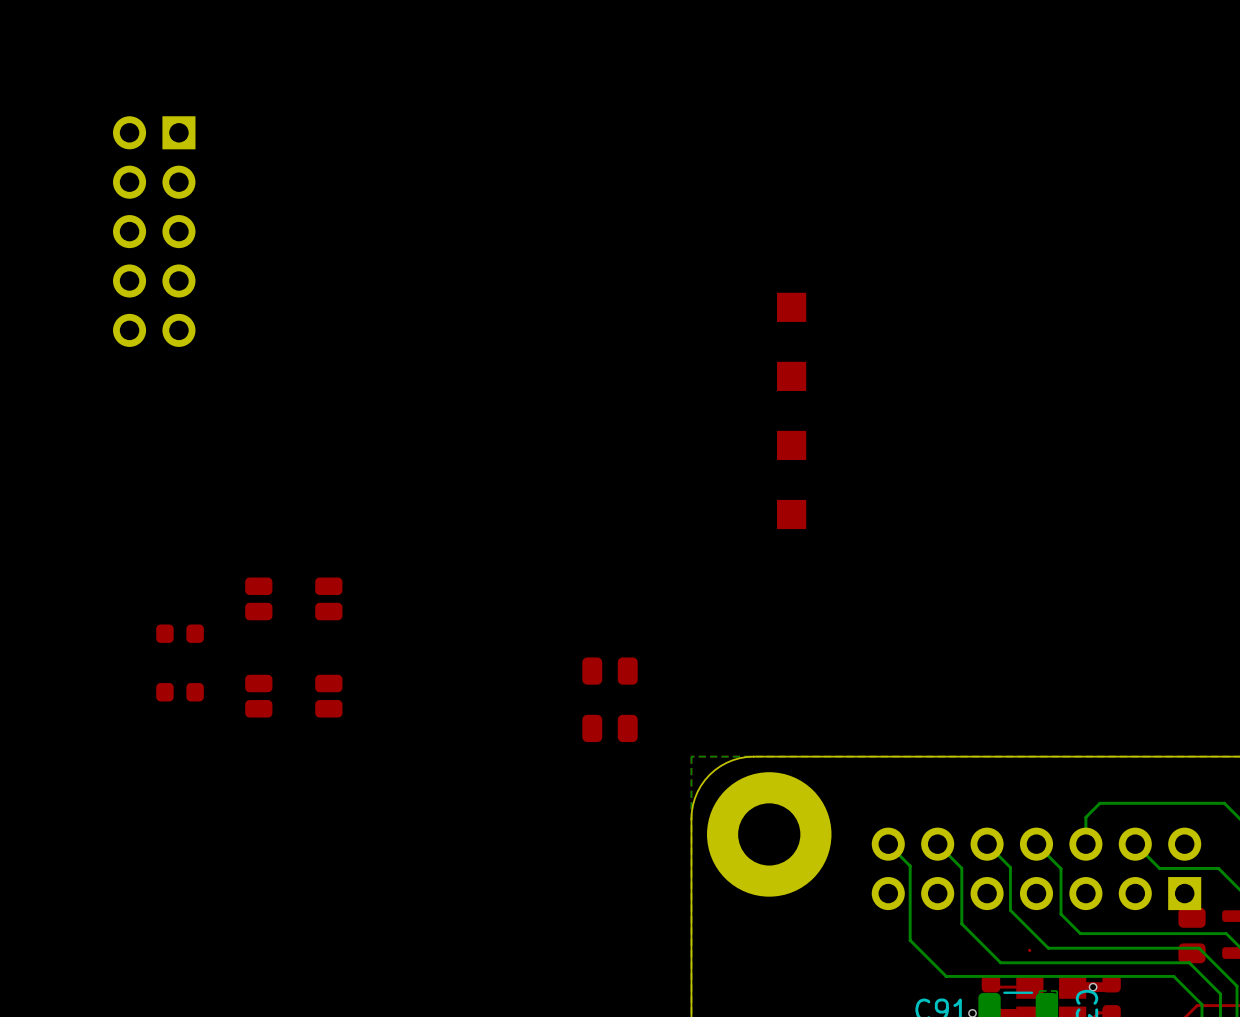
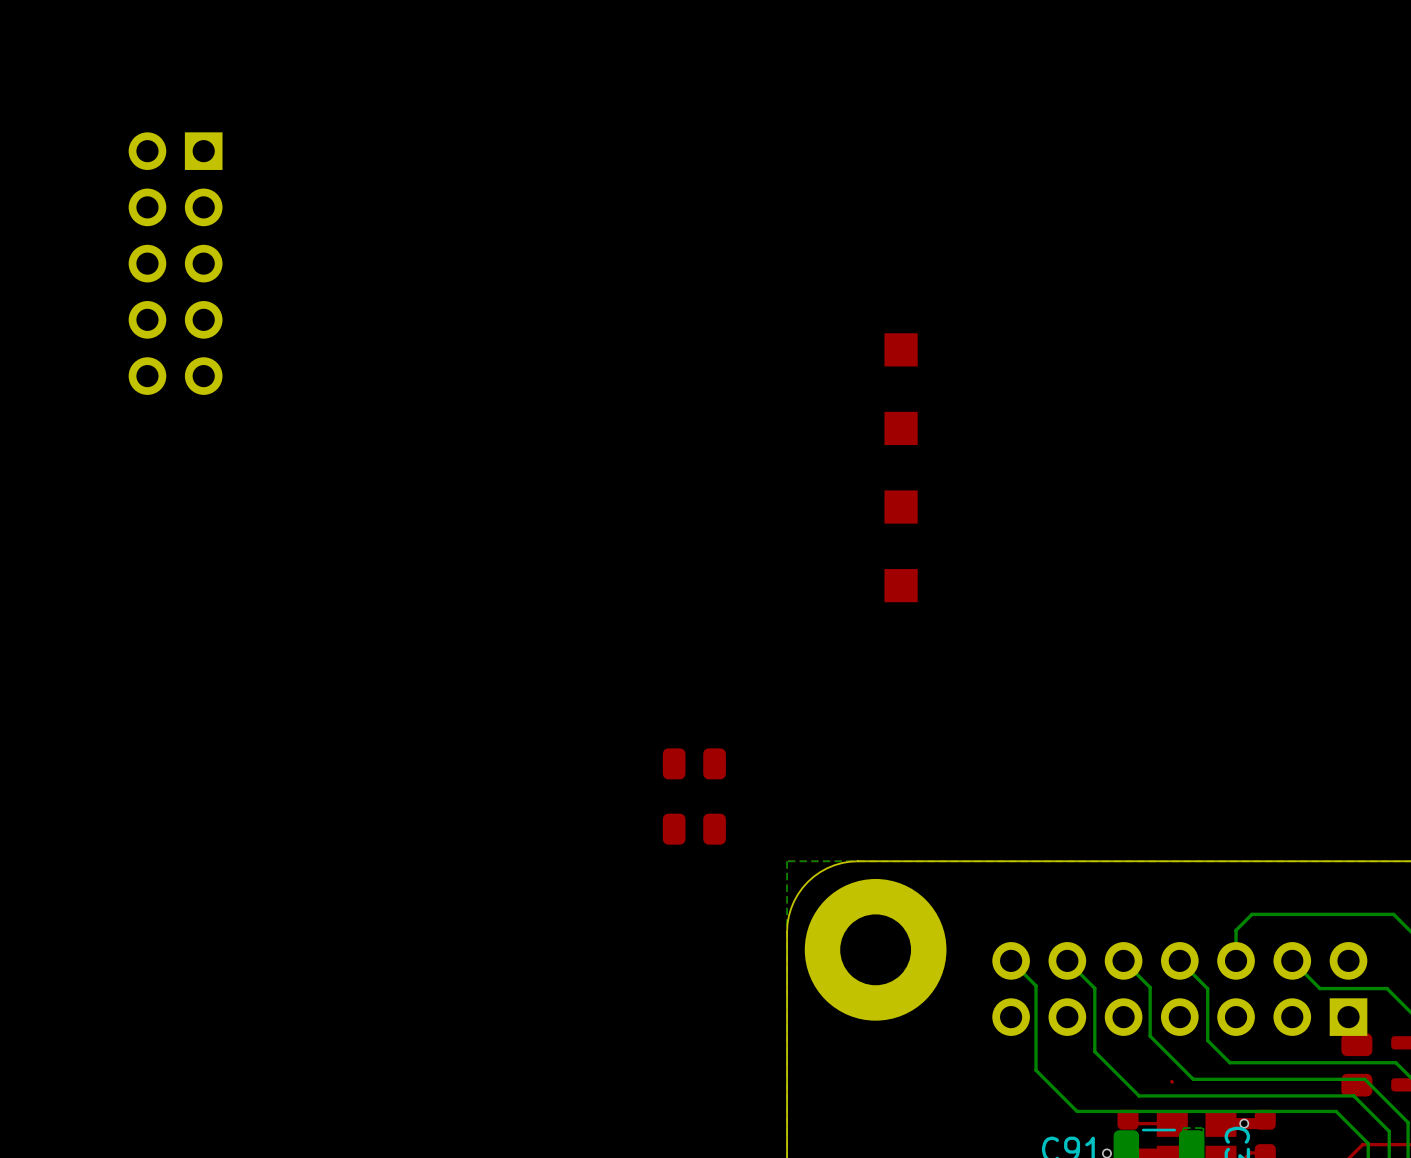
part: (293, 598) -> none
part: (180, 633) -> none
part: (180, 692) -> none
part: (293, 696) -> none

